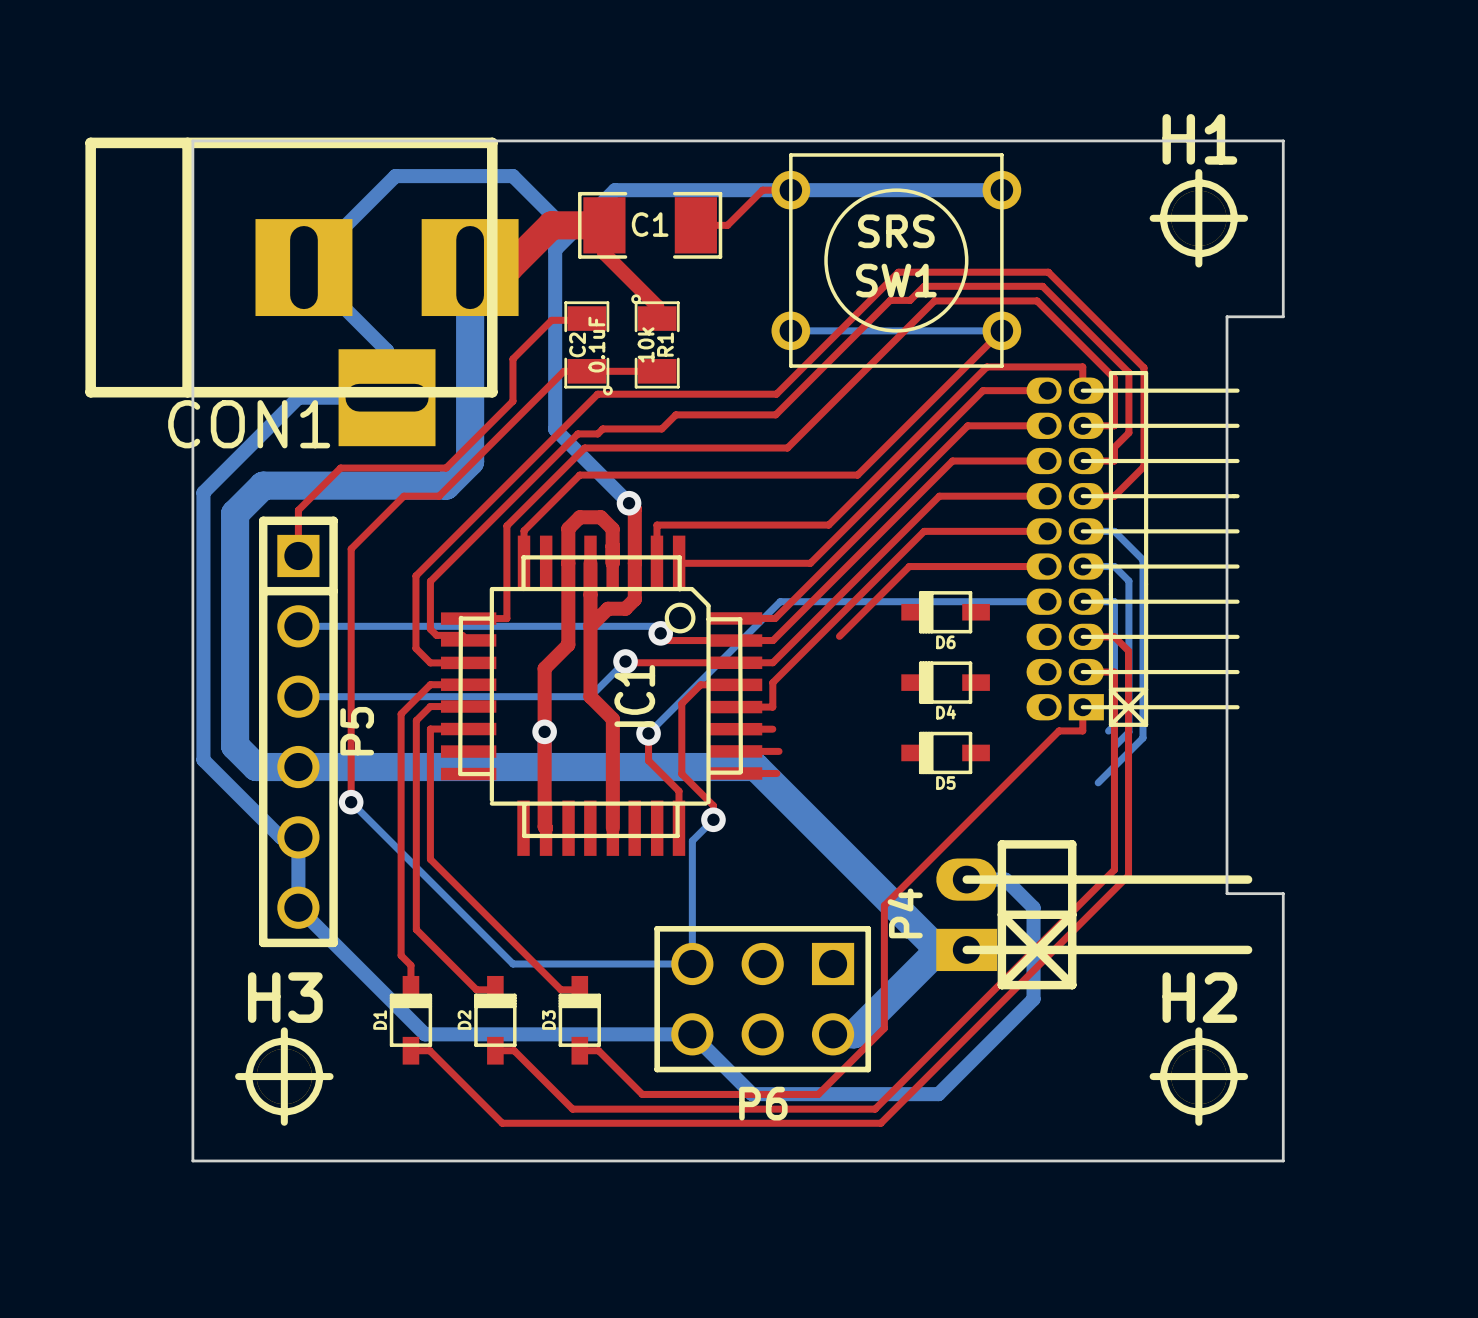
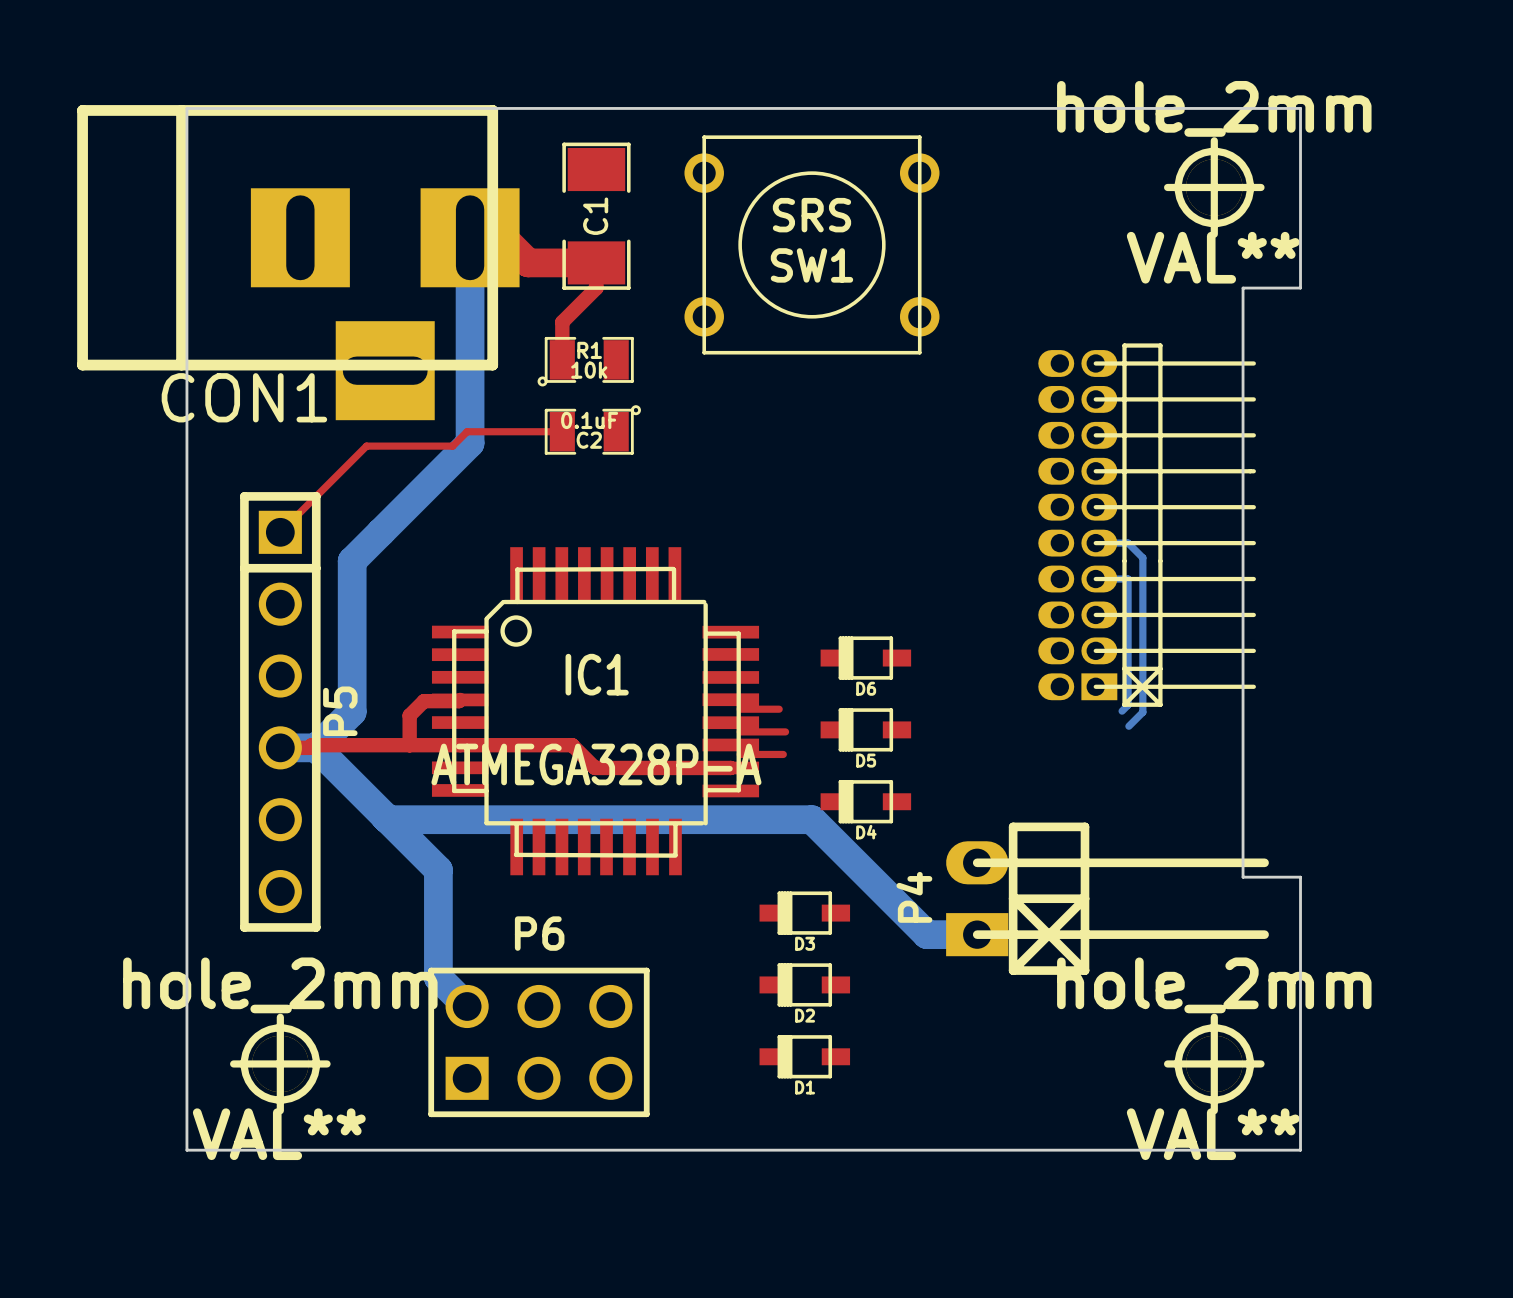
H1 name: H1 (1199, 139) -> hole_2mm (1214, 108)
top track: (790, 190) (762, 190) (727, 225) (695, 225) -> none
bottom track: (1001, 190) (614, 190) (555, 249) -> none
C1 rotation: 0° (650, 225) -> 90° clockwise (596, 216)
SW1 position: (896, 260) -> (811, 244)
top track: (502, 267) (509, 267) (551, 225) (604, 225) (604, 253) (657, 306) (657, 318) -> (503, 237) (528, 262) (596, 262) (596, 288) (562, 322) (562, 359)
H1 value: none -> VAL** (1213, 257)
top track: (586, 318) (585, 320) (551, 320) (512, 359) (512, 401) (446, 468) (340, 468) (298, 510) (298, 555) -> none
bottom track: (790, 330) (1001, 330) -> none
top track: (1001, 330) (857, 475) (579, 475) (524, 530) (524, 563) -> none
R1 rotation: 0° (655, 341) -> 90° counterclockwise (585, 361)
R1 position: (655, 341) -> (585, 361)
C2 rotation: 0° (588, 348) -> 90° counterclockwise (592, 429)
C2 position: (588, 348) -> (592, 429)
top track: (657, 371) (563, 371) (439, 496) (403, 496) (351, 548) (351, 802) -> none
top track: (1047, 390) (983, 390) (810, 563) (679, 563) -> none
top track: (1082, 390) (1082, 366) (986, 366) (828, 525) (656, 525) (656, 563) -> none
top track: (1047, 425) (967, 425) (775, 618) (734, 618) -> none
top track: (1082, 425) (1114, 425) (1114, 378) (1037, 300) (934, 300) (787, 448) (584, 448) (506, 525) (506, 618) (468, 618) -> none
top track: none -> (562, 431) (467, 431) (452, 446) (366, 446) (280, 532)
bottom track: (470, 461) (446, 485) (263, 485) (235, 513) (235, 745) (256, 767) (284, 767) -> (470, 435) (470, 443) (352, 561) (352, 711) (316, 747) (438, 869) (438, 977) (467, 1006)
top track: (1047, 461) (952, 461) (773, 640) (667, 640) (660, 633) -> none
top track: (1082, 461) (1114, 461) (1114, 447) (1128, 432) (1128, 372) (1042, 286) (924, 286) (910, 300) (890, 300) (775, 414) (675, 414) (661, 428) (602, 428) (597, 433) (577, 433) (430, 581) (430, 629) (436, 635) (462, 635) (467, 640) -> none
top track: (1047, 496) (939, 496) (772, 662) (625, 661) -> none
top track: (1082, 496) (1114, 496) (1143, 466) (1143, 367) (1048, 272) (898, 272) (776, 394) (597, 394) (415, 575) (415, 648) (430, 662) (468, 662) -> none
bottom track: (629, 503) (555, 429) (555, 218) (512, 176) (395, 176) (303, 267) (387, 350) (387, 397) (298, 397) (203, 492) (203, 759) (280, 837) (298, 837) (298, 907) (425, 1034) (692, 1034) (752, 1094) (938, 1094) (1033, 999) (1033, 907) (1005, 879) (966, 879) -> none
top track: (629, 503) (634, 508) (634, 599) (625, 608) (607, 608) (590, 626) -> none
via: (629, 503) -> none
top track: (1047, 531) (924, 531) (772, 682) (772, 707) (734, 707) -> none
bottom track: (1082, 531) (1114, 531) (1143, 559) (1143, 738) (1098, 782) -> none
top track: (612, 563) (612, 529) (600, 517) (579, 517) (568, 528) (568, 644) (544, 668) (545, 827) -> none
top track: (1047, 566) (909, 566) (839, 636) -> none
top track: (590, 594) (590, 563) (590, 696) (612, 719) (612, 828) -> none
bottom track: (1047, 601) (780, 601) (648, 733) -> none
D6 position: (945, 612) -> (865, 658)
bottom track: (298, 626) (653, 626) (660, 633) -> none
via: (660, 633) -> none
top track: (1082, 636) (1114, 636) (1128, 650) (1128, 875) (880, 1123) (502, 1123) (429, 1050) (410, 1050) -> none
bottom track: (625, 661) (590, 696) (298, 696) -> none
via: (625, 661) -> none
top track: (1082, 672) (1114, 672) (1114, 869) (875, 1109) (572, 1109) (514, 1050) (495, 1050) -> none
D4 position: (945, 682) -> (865, 801)
top track: (468, 684) (430, 684) (401, 714) (401, 955) (410, 965) (410, 989) -> none
top track: (734, 684) (700, 684) (681, 703) (681, 774) (713, 805) (713, 819) -> none
IC1 rotation: 0° (601, 695) -> 90° counterclockwise (595, 711)
top track: (468, 706) (430, 706) (416, 720) (416, 929) (476, 989) (495, 989) -> none
top track: (1082, 707) (1082, 730) (1059, 730) (884, 905) (884, 1028) (818, 1094) (642, 1094) (598, 1050) (579, 1050) -> none
top track: none -> (460, 699) (424, 701) (409, 715) (409, 745)
top track: (468, 729) (430, 729) (430, 859) (560, 989) (579, 989) -> none
P5 position: (298, 731) -> (280, 711)
via: (544, 731) -> none
top track: (648, 733) (648, 760) (678, 791) (678, 828) -> none
via: (648, 733) -> none
D5 position: (945, 752) -> (865, 729)
top track: none -> (280, 747) (309, 747) (311, 745) (572, 745) (595, 767) (730, 767)
bottom track: (319, 767) (755, 767) (938, 949) (854, 1034) (833, 1034) -> none
IC1 value: none -> ATMEGA328P-A (596, 764)
bottom track: (351, 802) (512, 964) (692, 964) (692, 840) (713, 819) -> none
via: (351, 802) -> none
via: (713, 819) -> none
bottom track: none -> (388, 819) (811, 819) (926, 934) (948, 934)
H3 name: H3 (285, 997) -> hole_2mm (280, 985)
H2 name: H2 (1199, 997) -> hole_2mm (1214, 985)
P6 rotation: 0° (762, 999) -> 180° (538, 1042)
P6 position: (762, 999) -> (538, 1042)
D1 rotation: 0° (410, 1020) -> 90° counterclockwise (804, 1056)
D1 position: (410, 1020) -> (804, 1056)
D2 rotation: 0° (495, 1020) -> 90° counterclockwise (804, 984)
D2 position: (495, 1020) -> (804, 984)
D3 rotation: 0° (579, 1020) -> 90° counterclockwise (804, 913)
D3 position: (579, 1020) -> (804, 913)
H3 value: none -> VAL** (279, 1134)
H2 value: none -> VAL** (1213, 1134)

